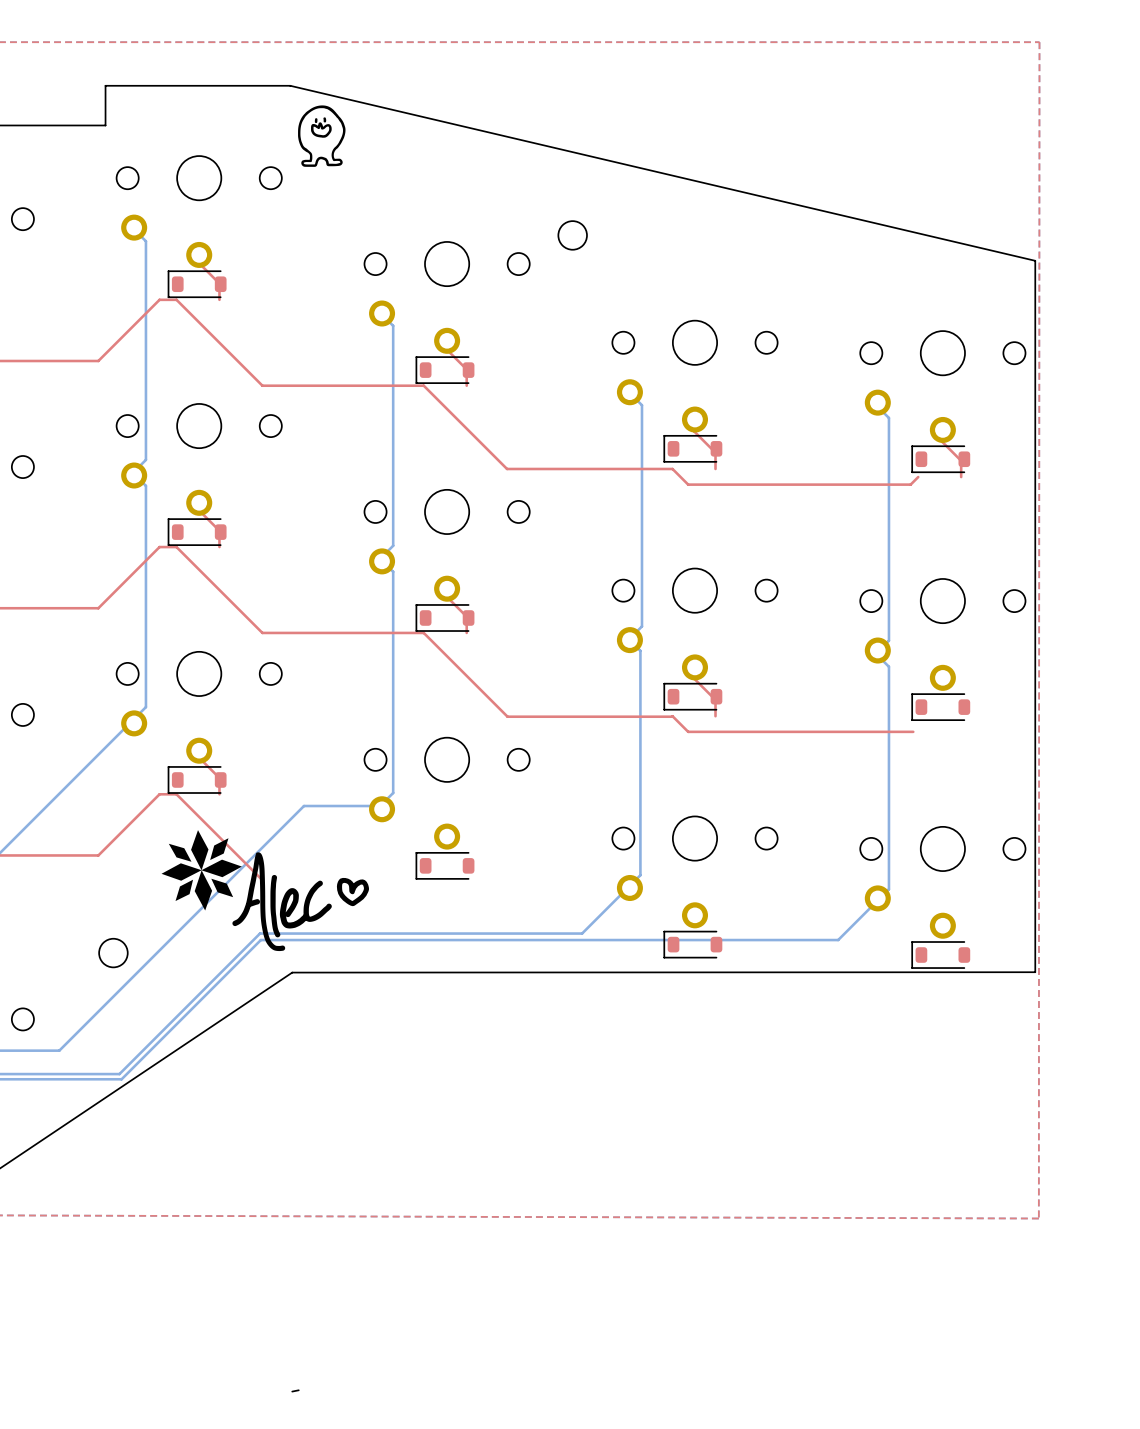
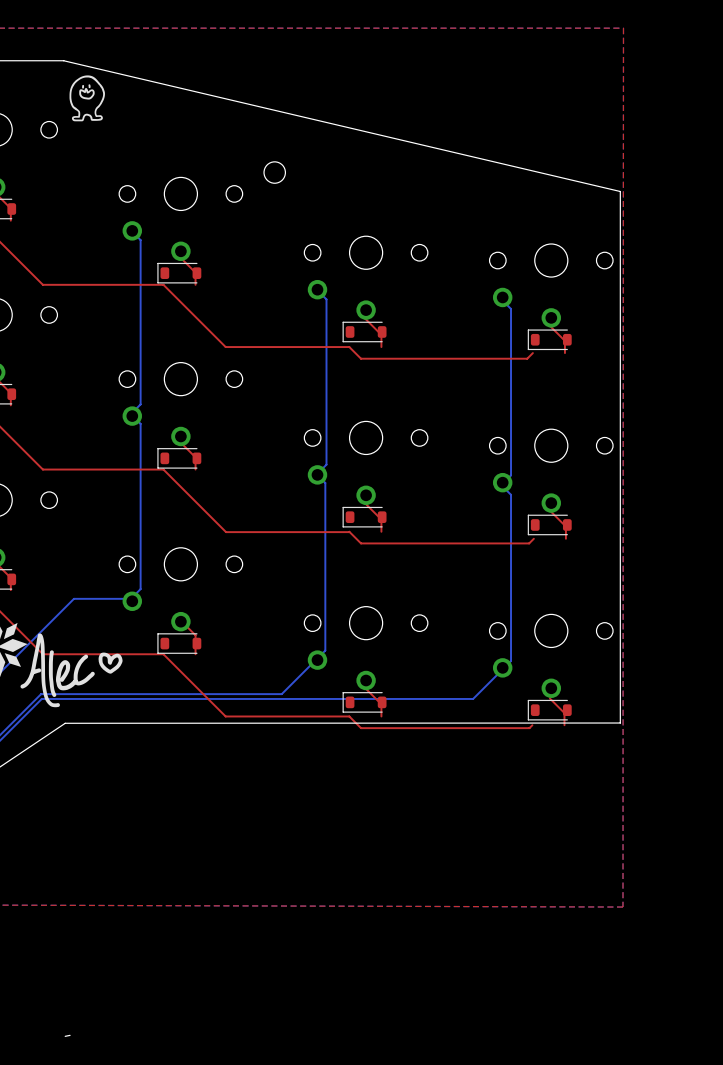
top track: none -> (549, 510) (565, 526) (565, 538)
top track: none -> (533, 538) (529, 543)
top track: none -> (179, 619) (195, 635) (195, 654)
top track: none -> (42, 654) (163, 654) (225, 716) (349, 716) (361, 728) (529, 728) (532, 725)
top track: none -> (365, 688) (381, 704) (381, 716)
top track: none -> (549, 698) (564, 713) (564, 725)

